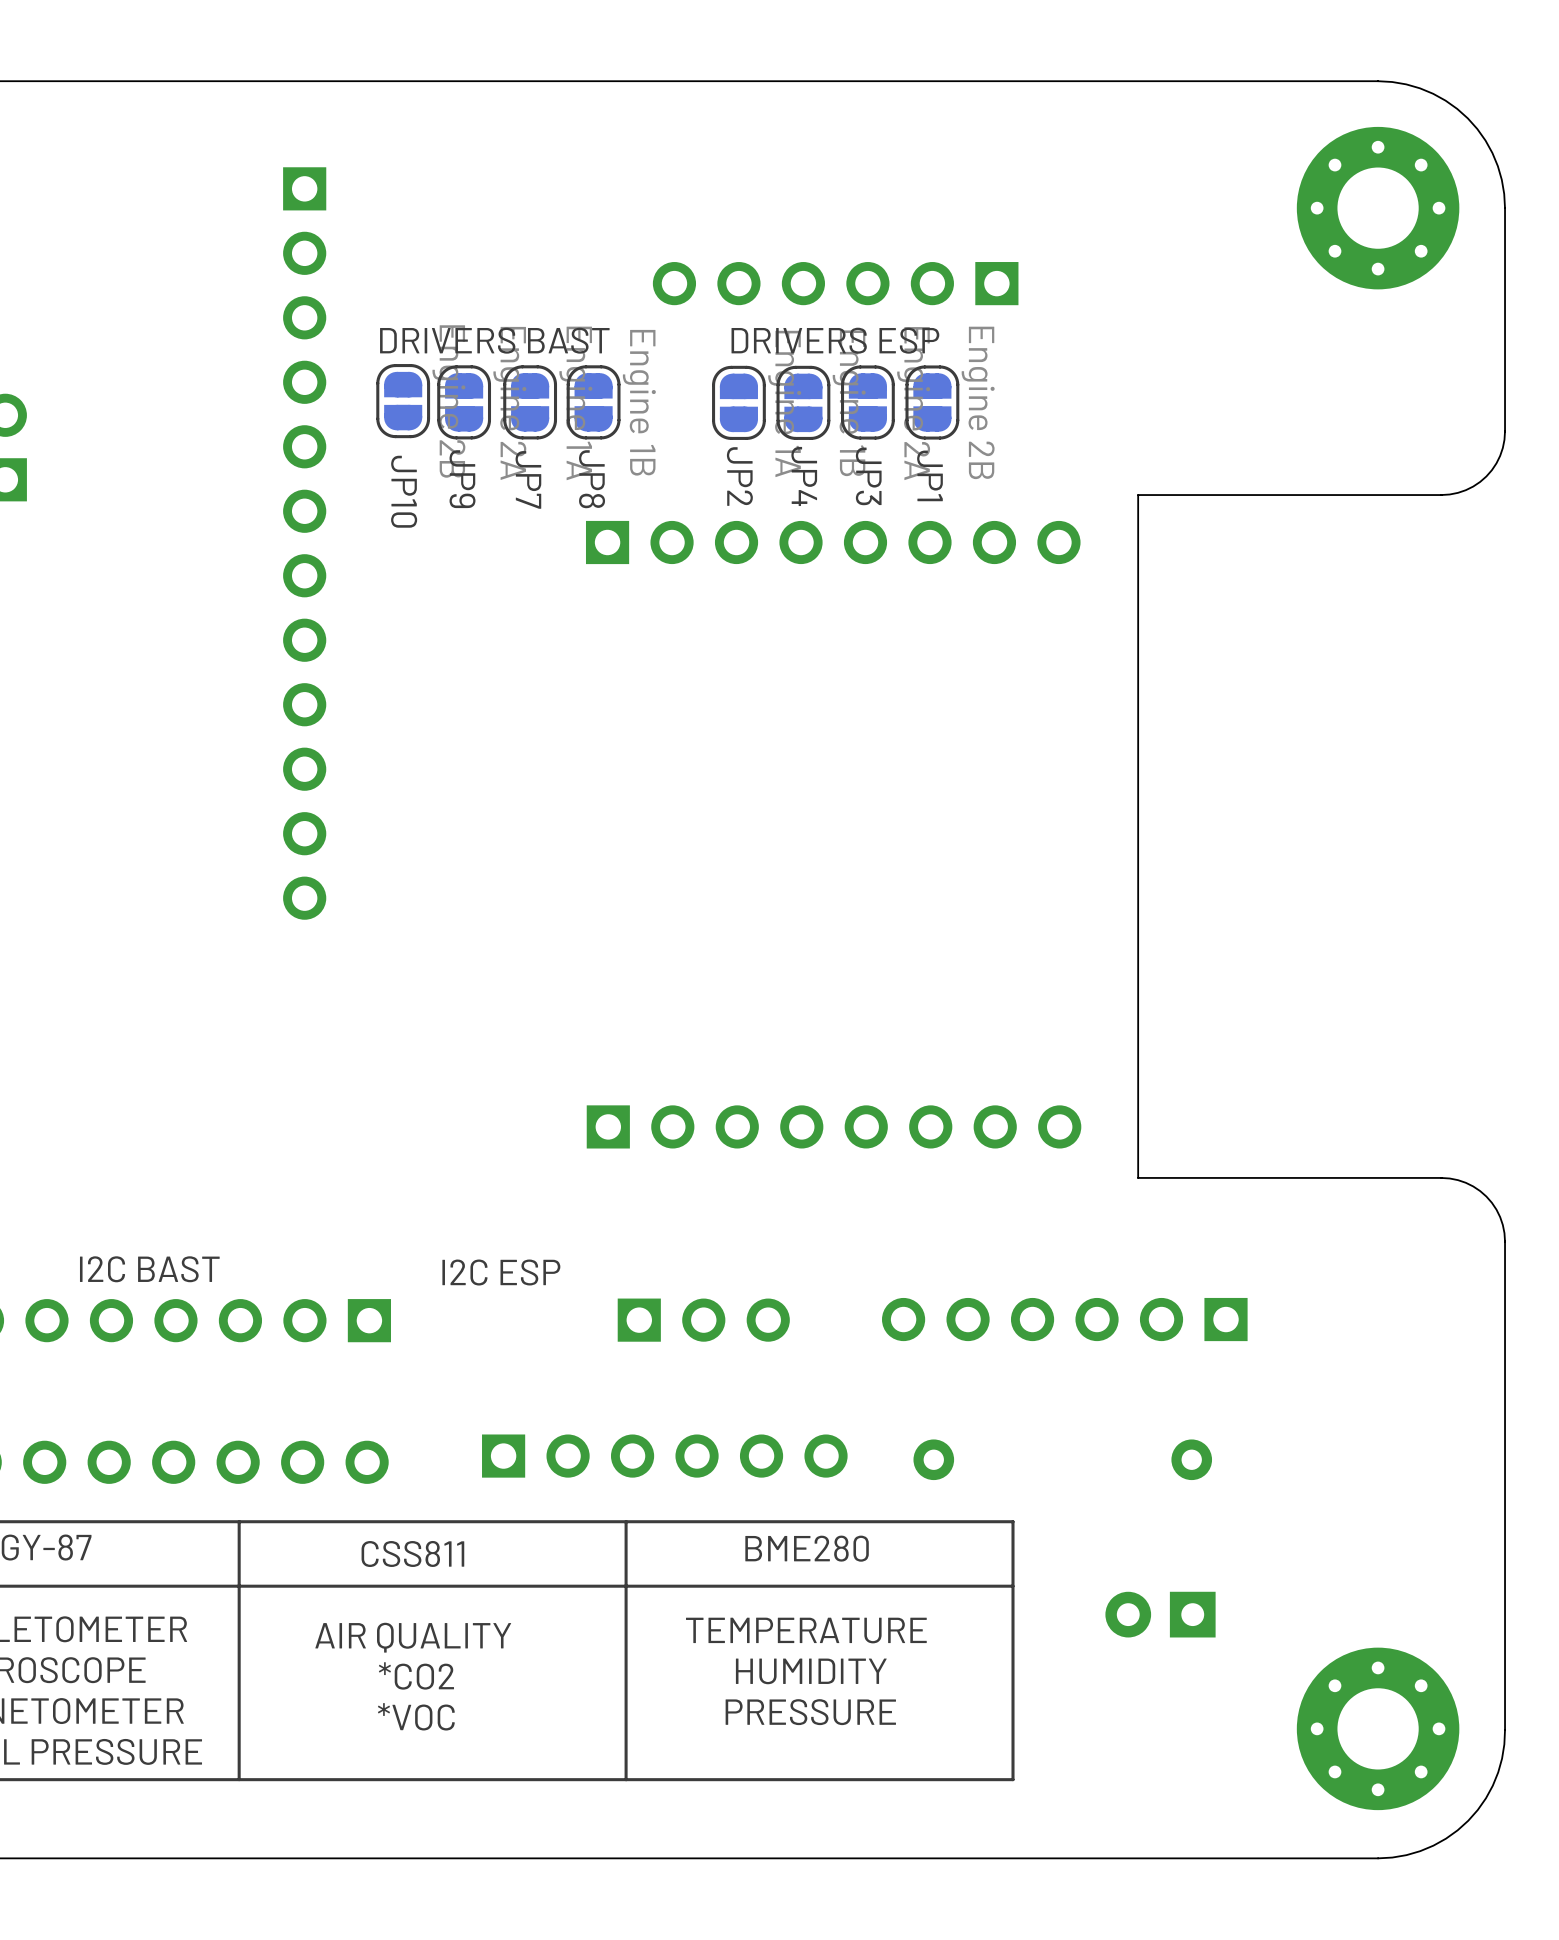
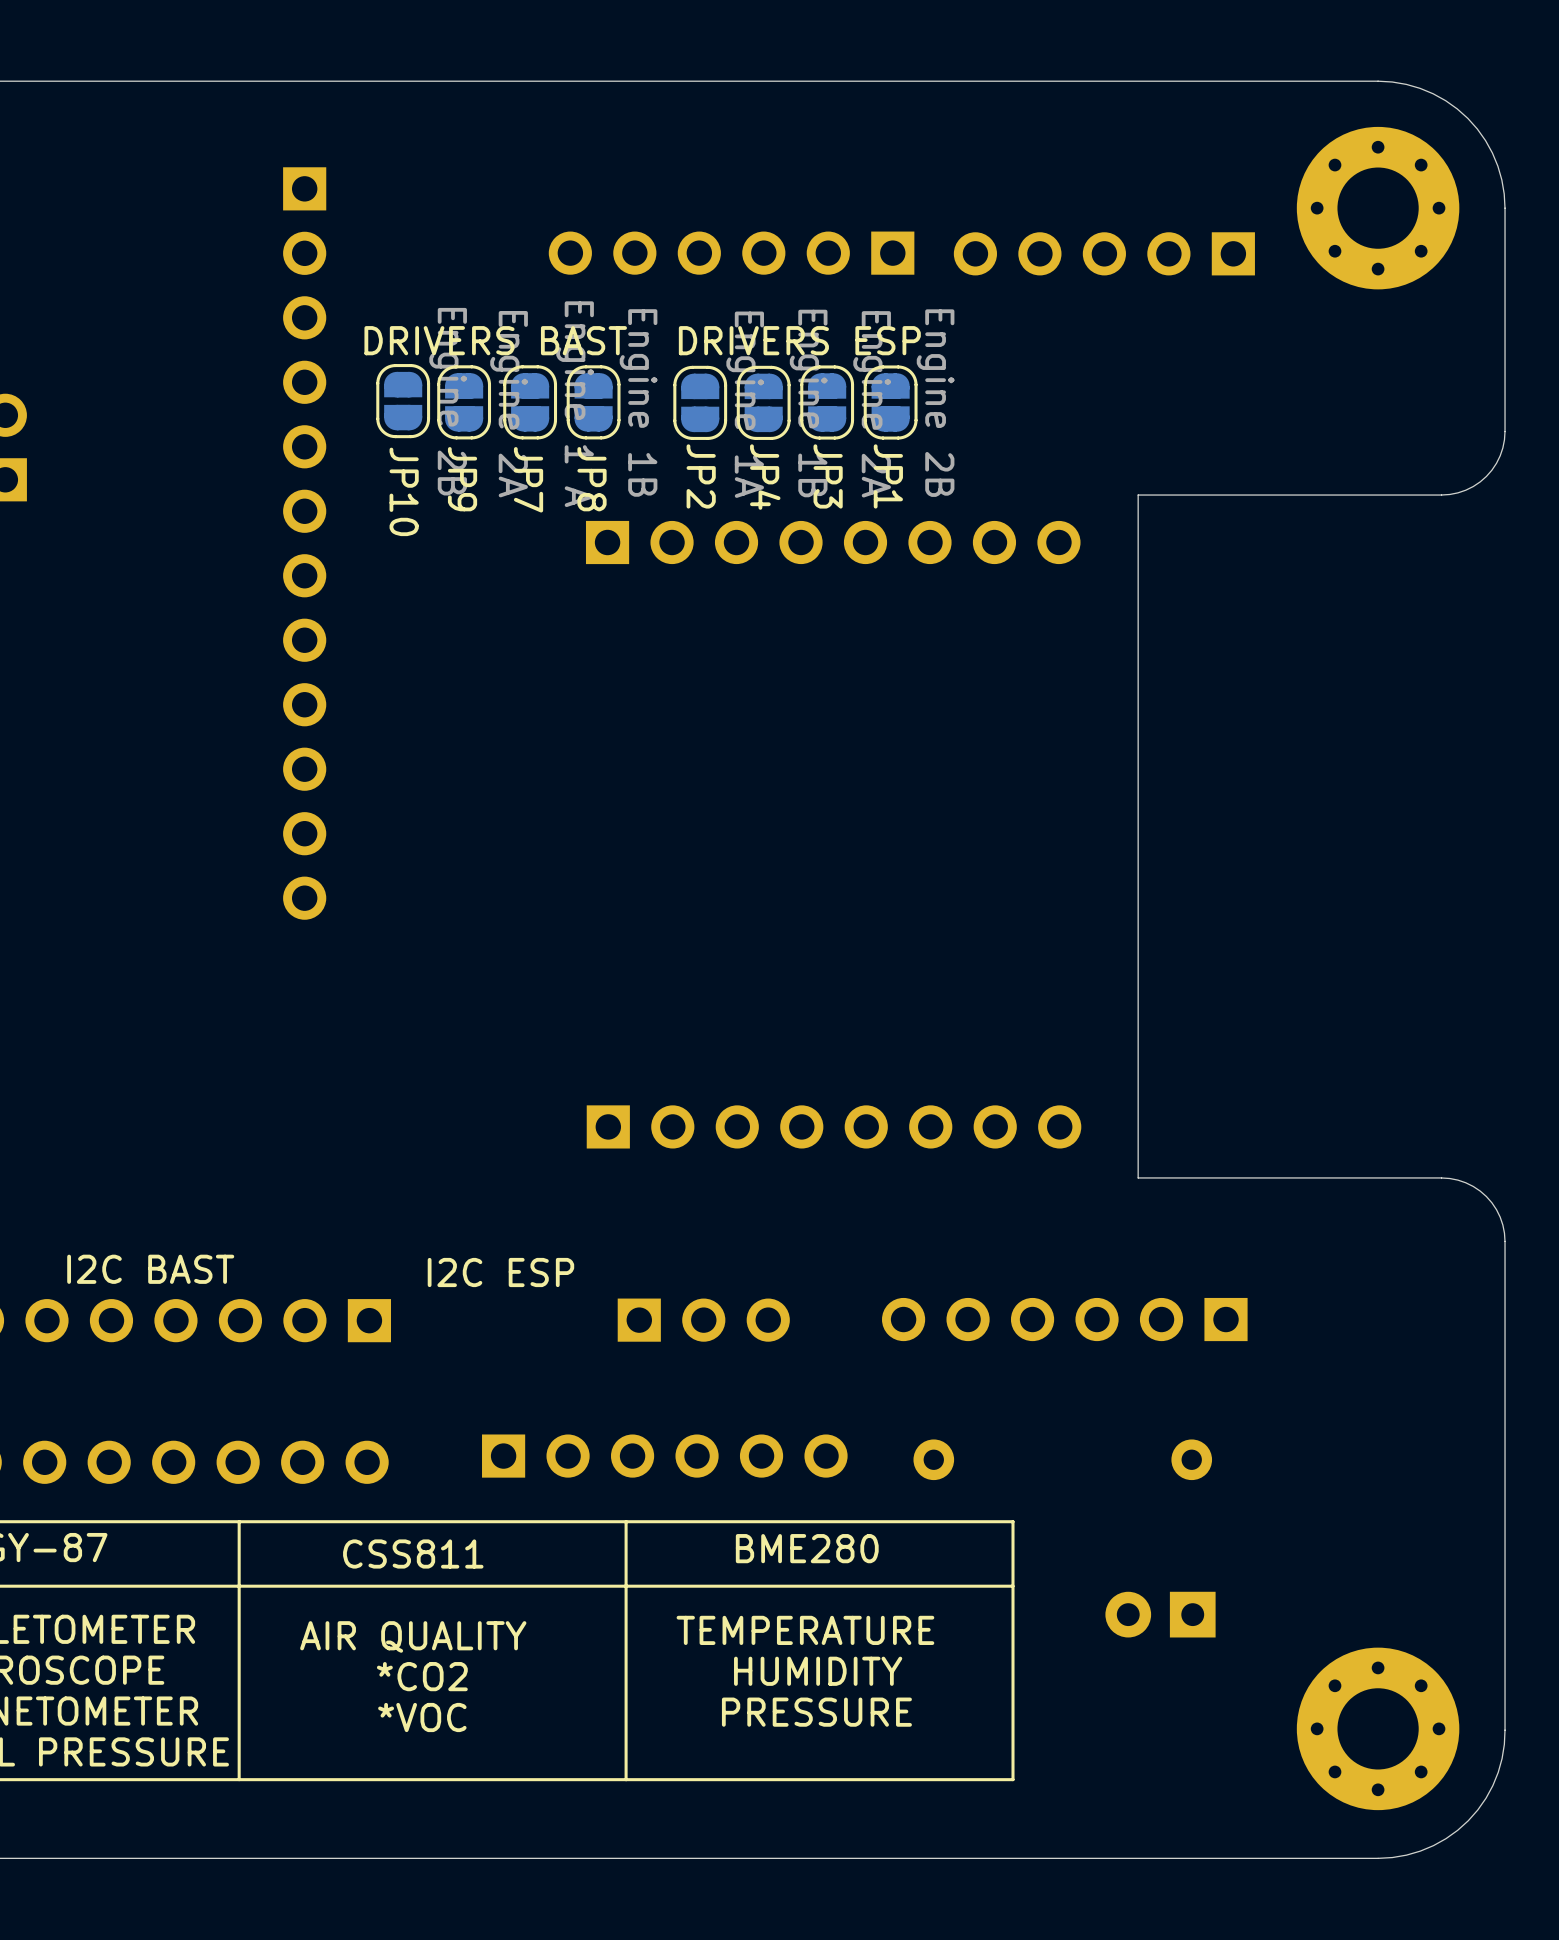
part: none -> (1104, 253)
part position: (835, 283) -> (731, 253)
text position: DRIVERS ESP (835, 340) -> DRIVERS ESP (799, 340)
JP2 position: (738, 402) -> (700, 402)
JP4 position: (803, 402) -> (763, 402)
JP3 position: (867, 402) -> (827, 402)
JP1 position: (932, 402) -> (890, 402)

